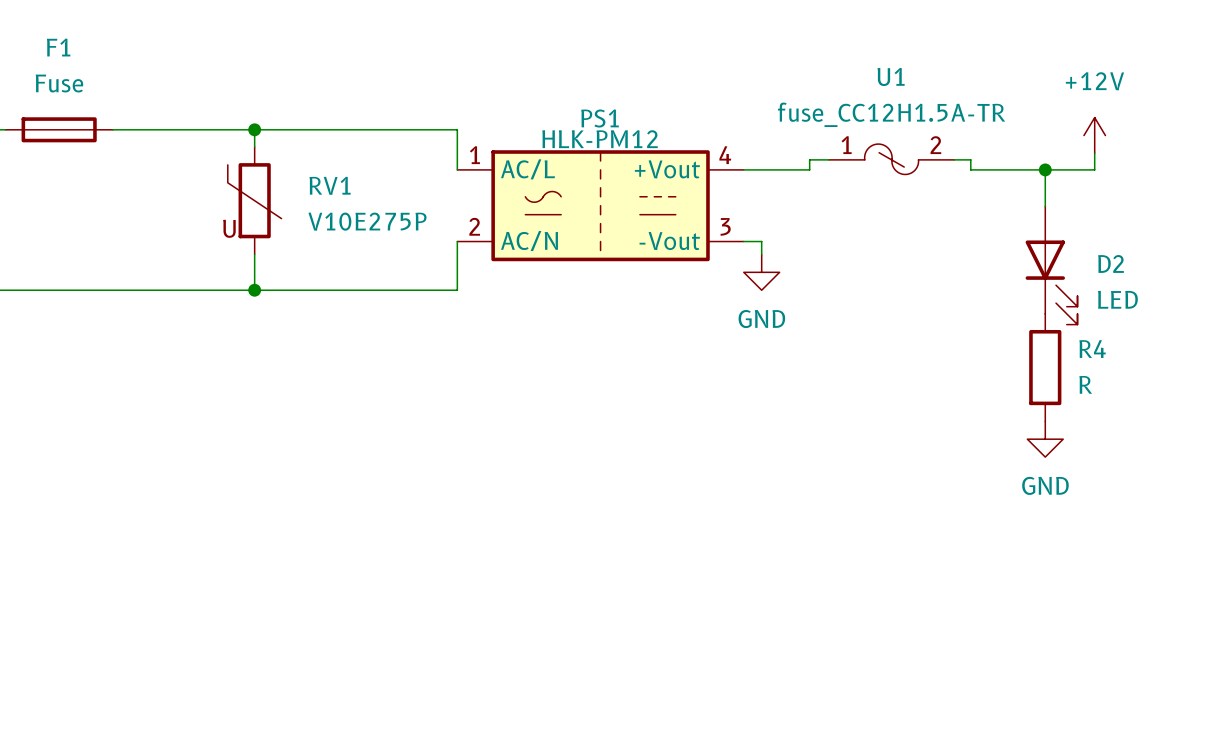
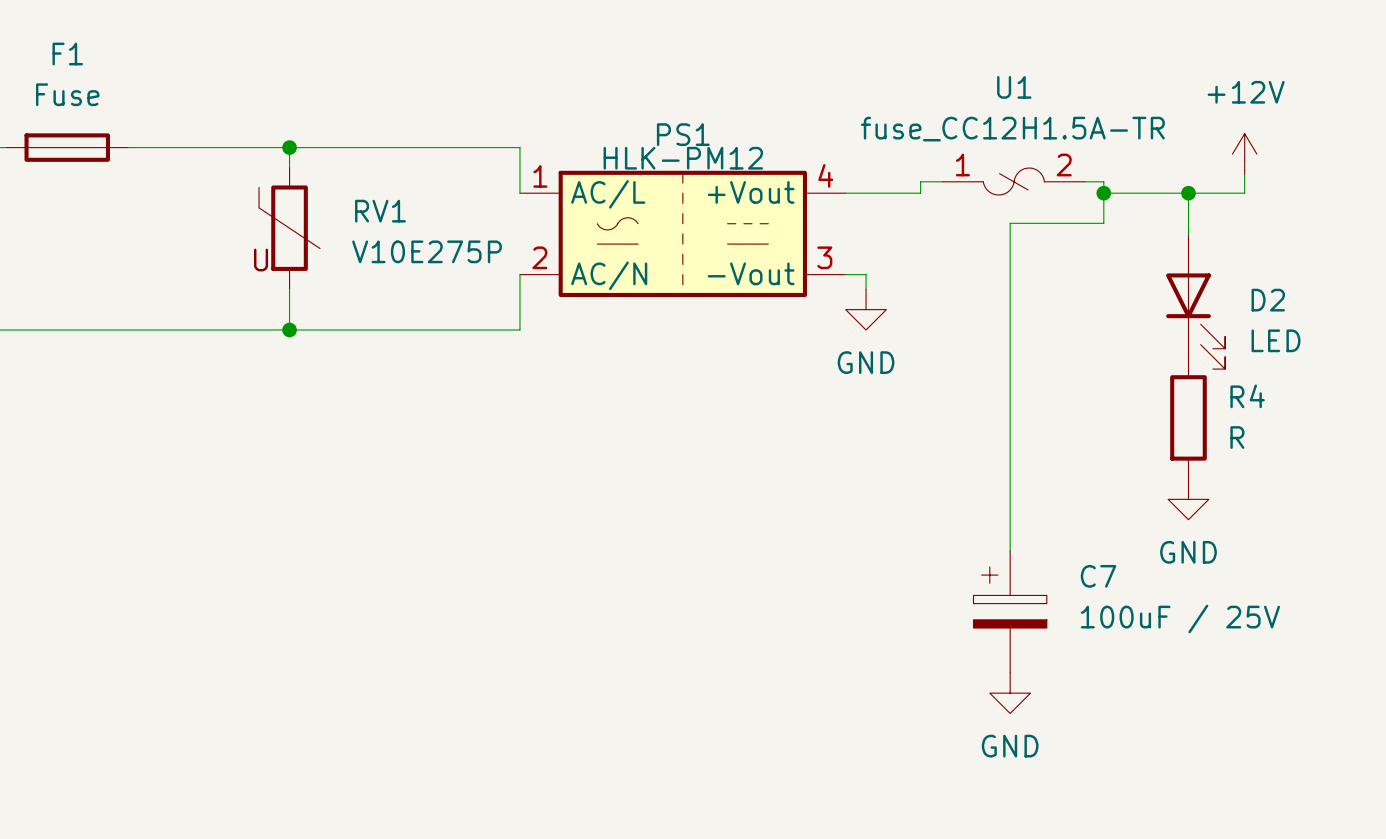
U1 symbol: [829, 144, 955, 175] -> [942, 168, 1086, 195]
wire: none -> (1103, 193) (1103, 223) (1010, 223) (1010, 550)
junction: none -> (1103, 193)
C7: none -> 100uF / 25V (1010, 611)
power symbol: none -> GND (1010, 693)

